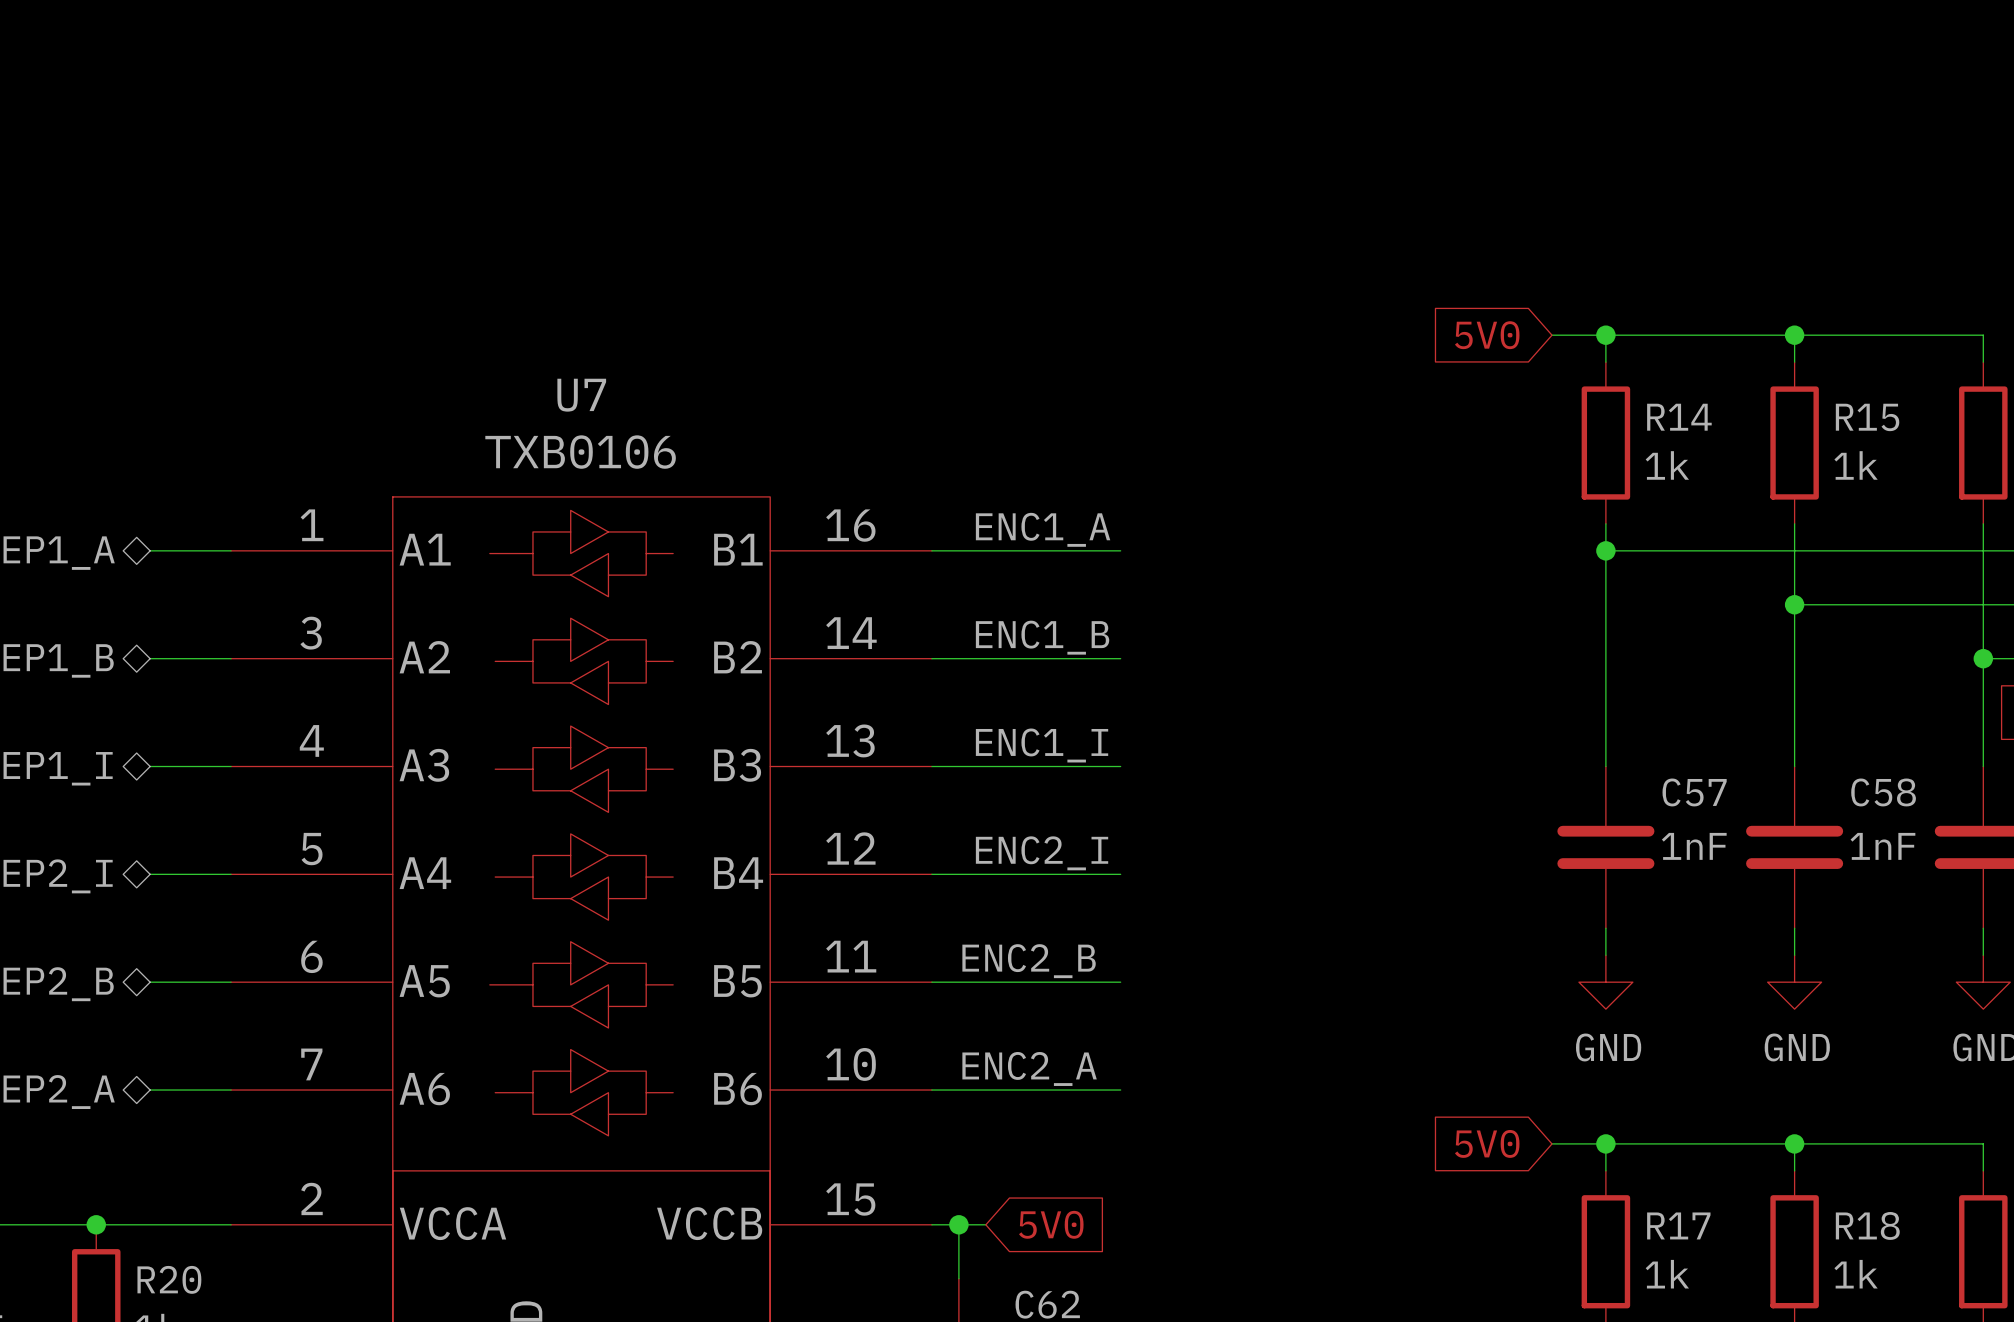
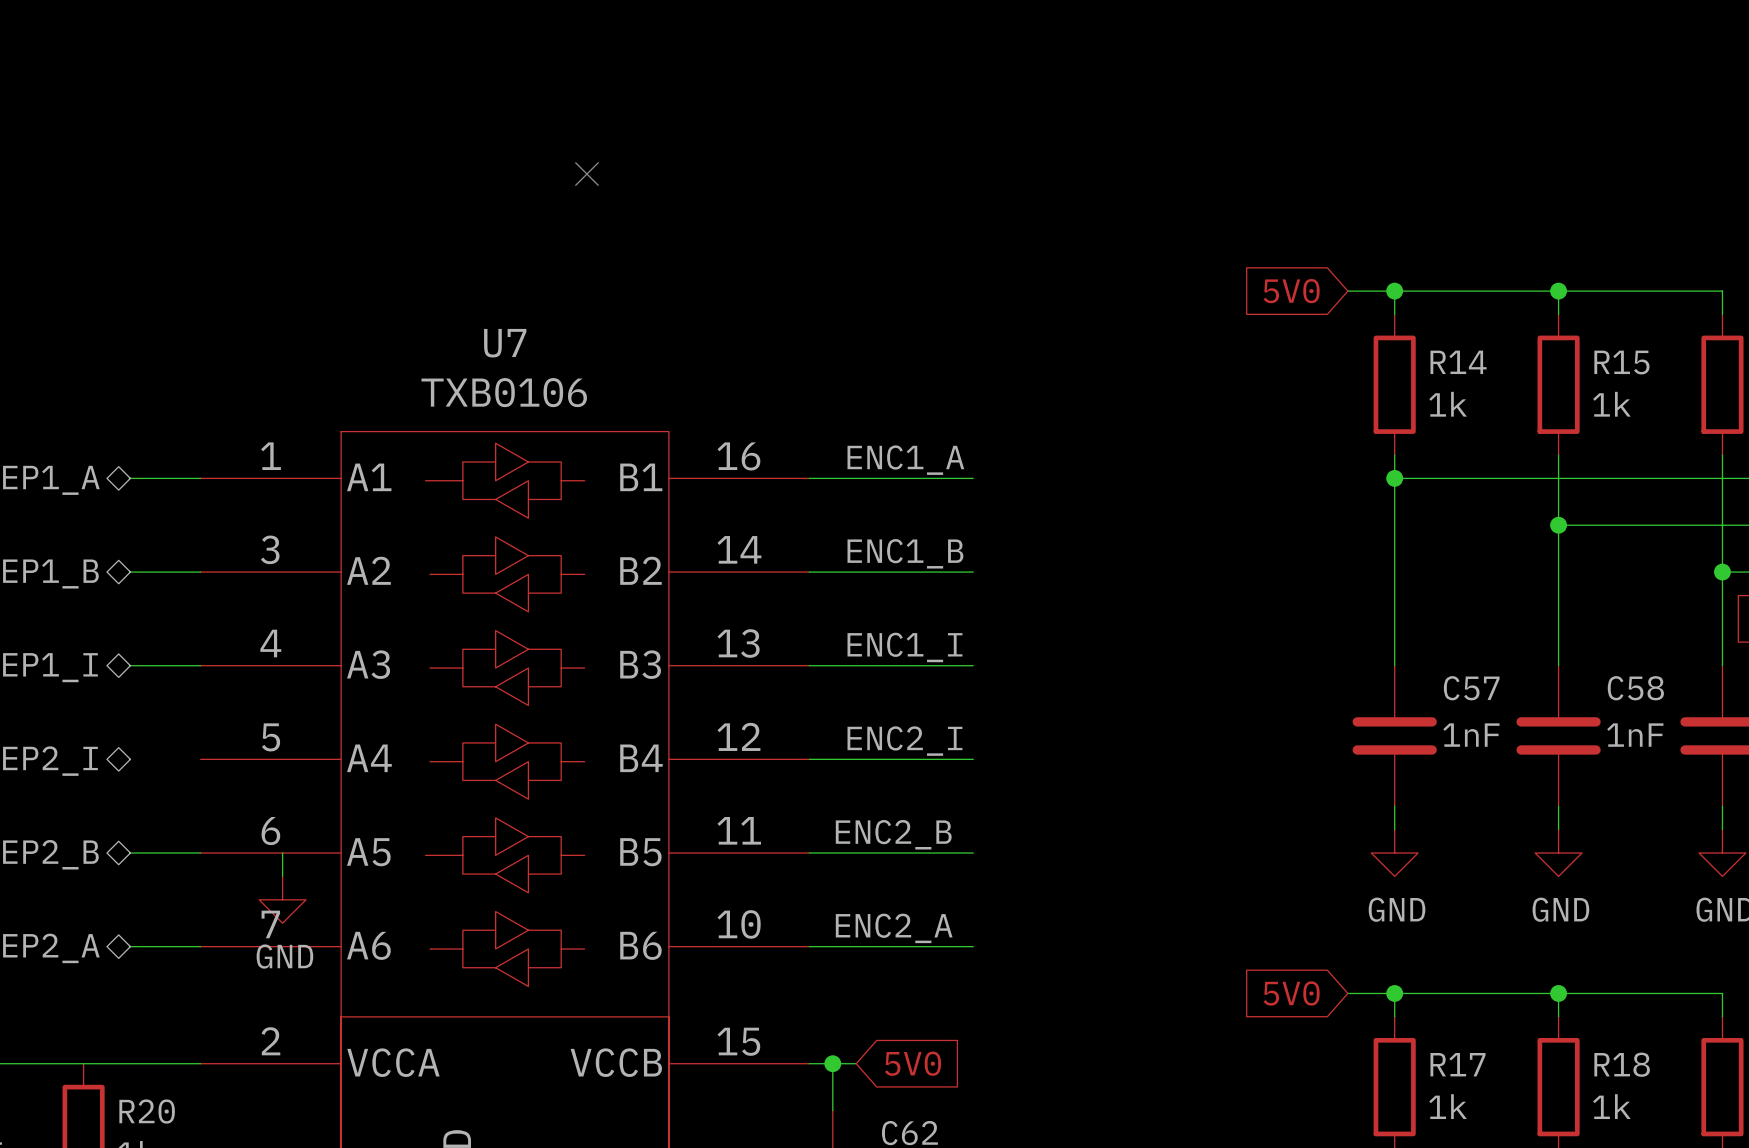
no-connect mark: none -> (586, 174)
wire: (150, 874) (231, 874) -> none
wire: none -> (282, 853) (282, 876)
power symbol: none -> GND (282, 899)
junction: (96, 1224) -> none

